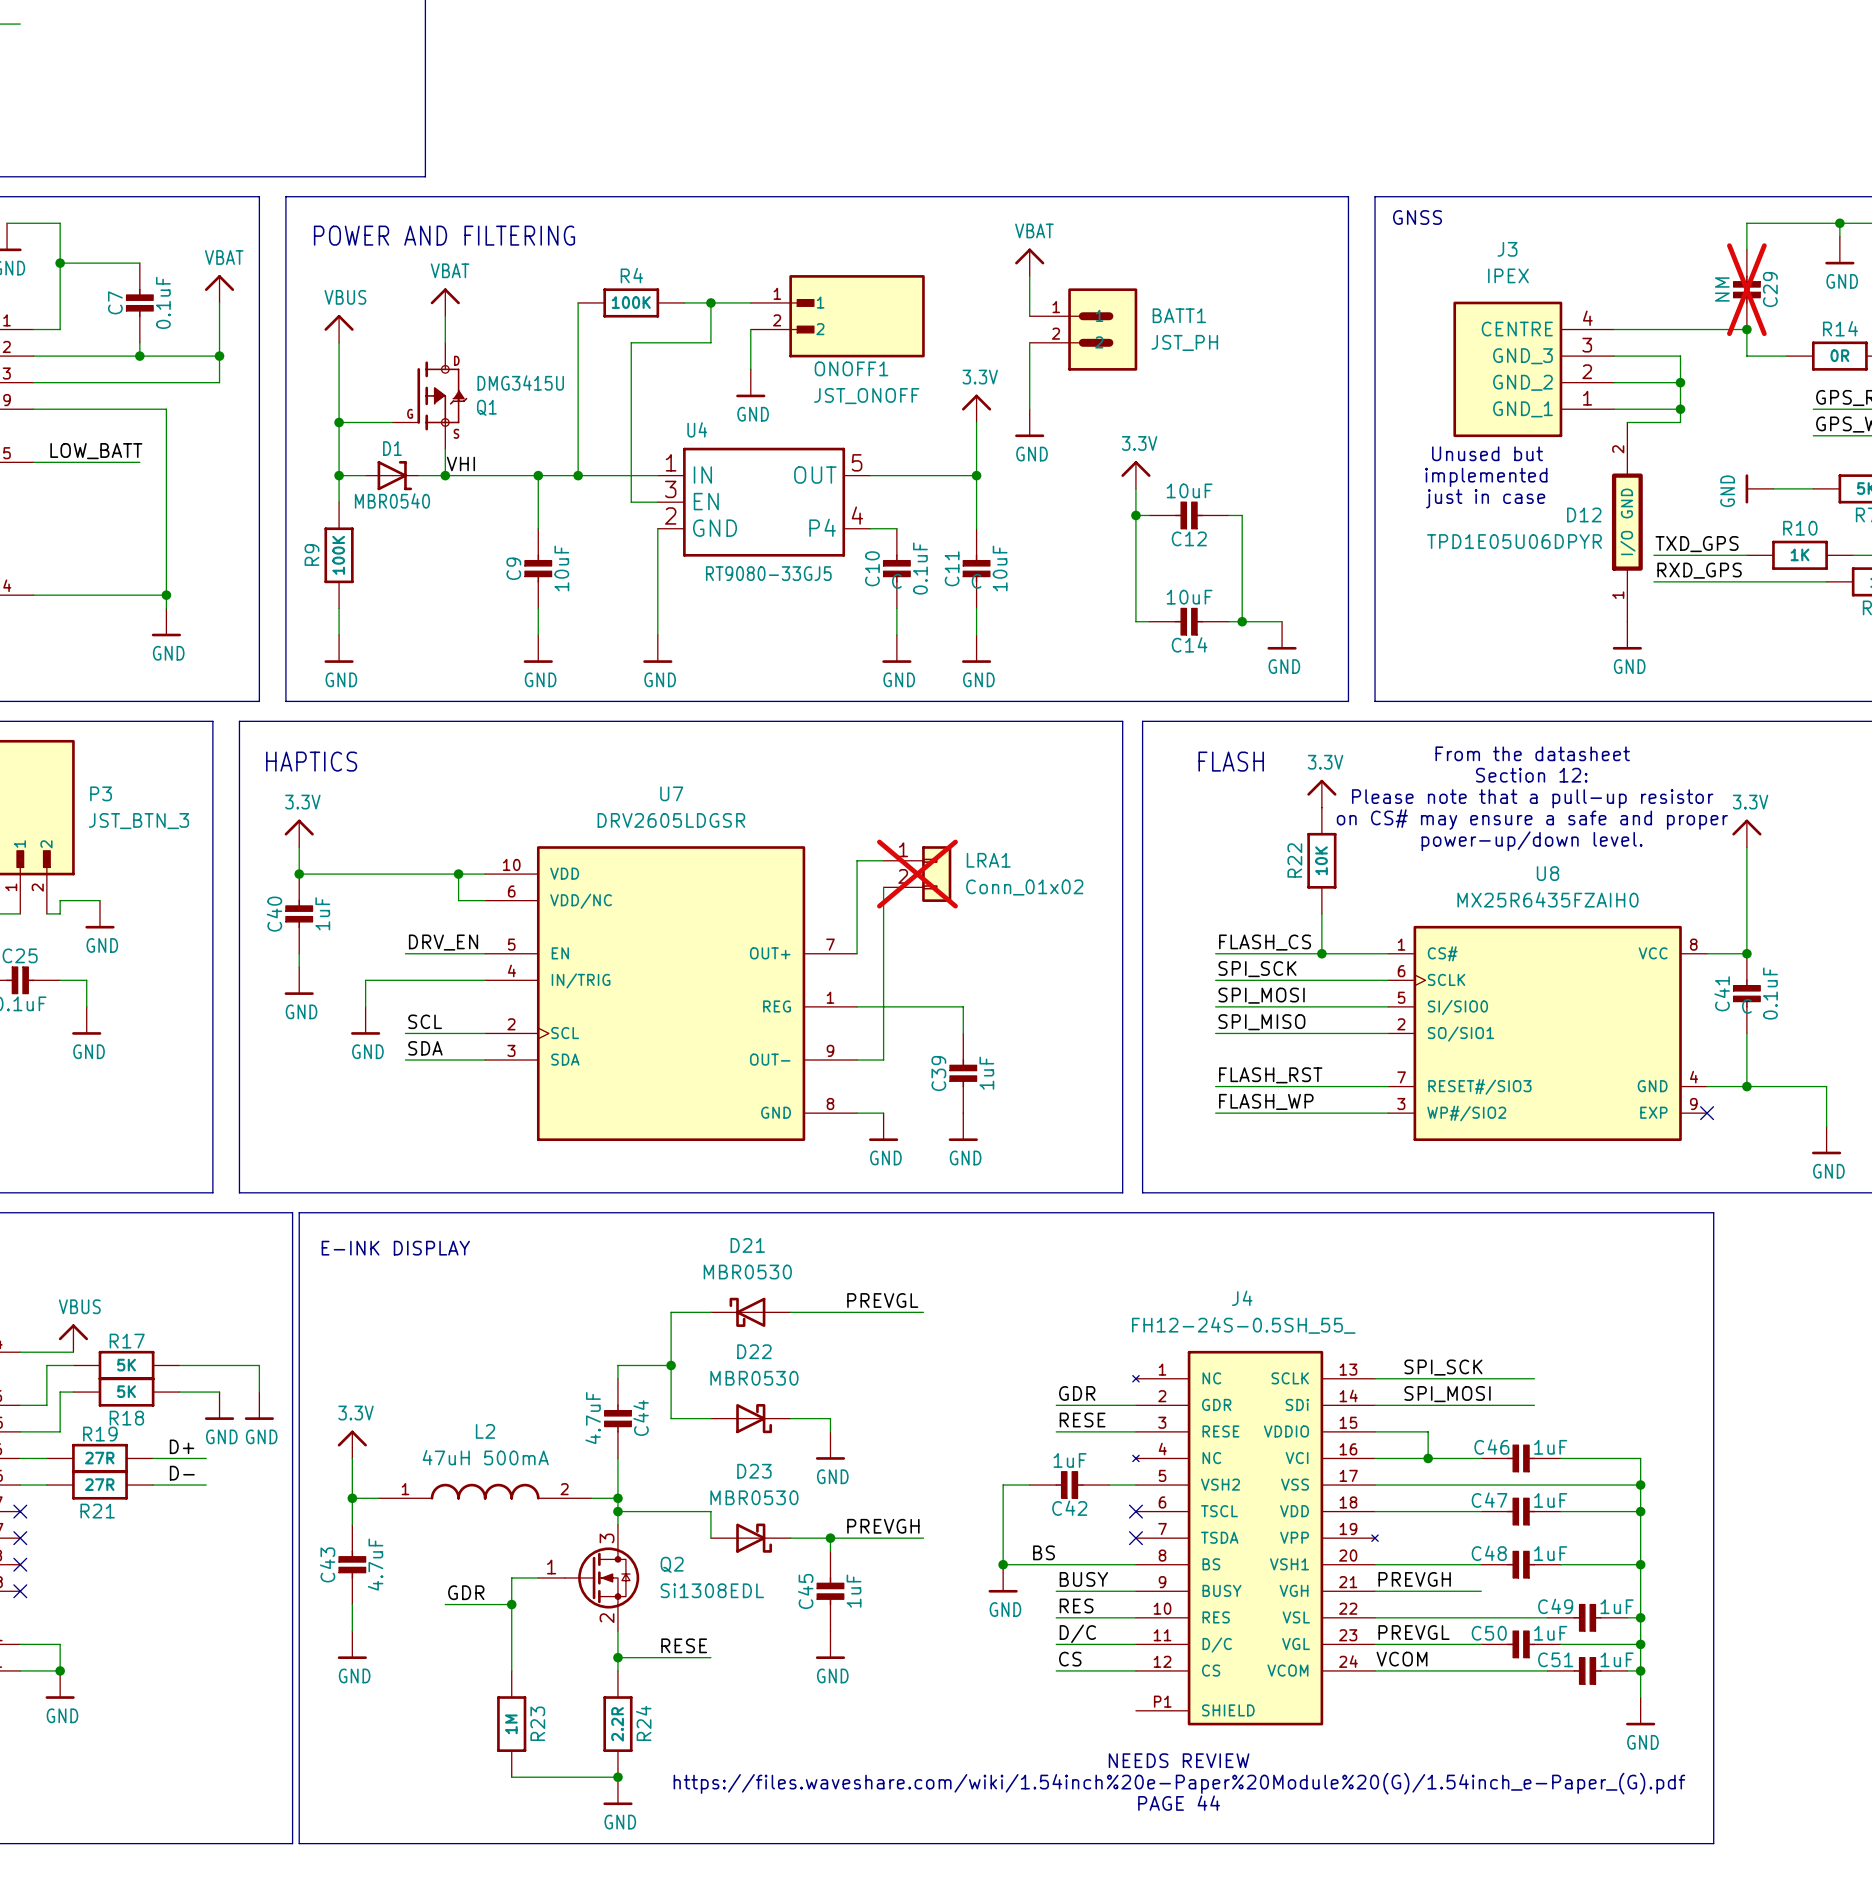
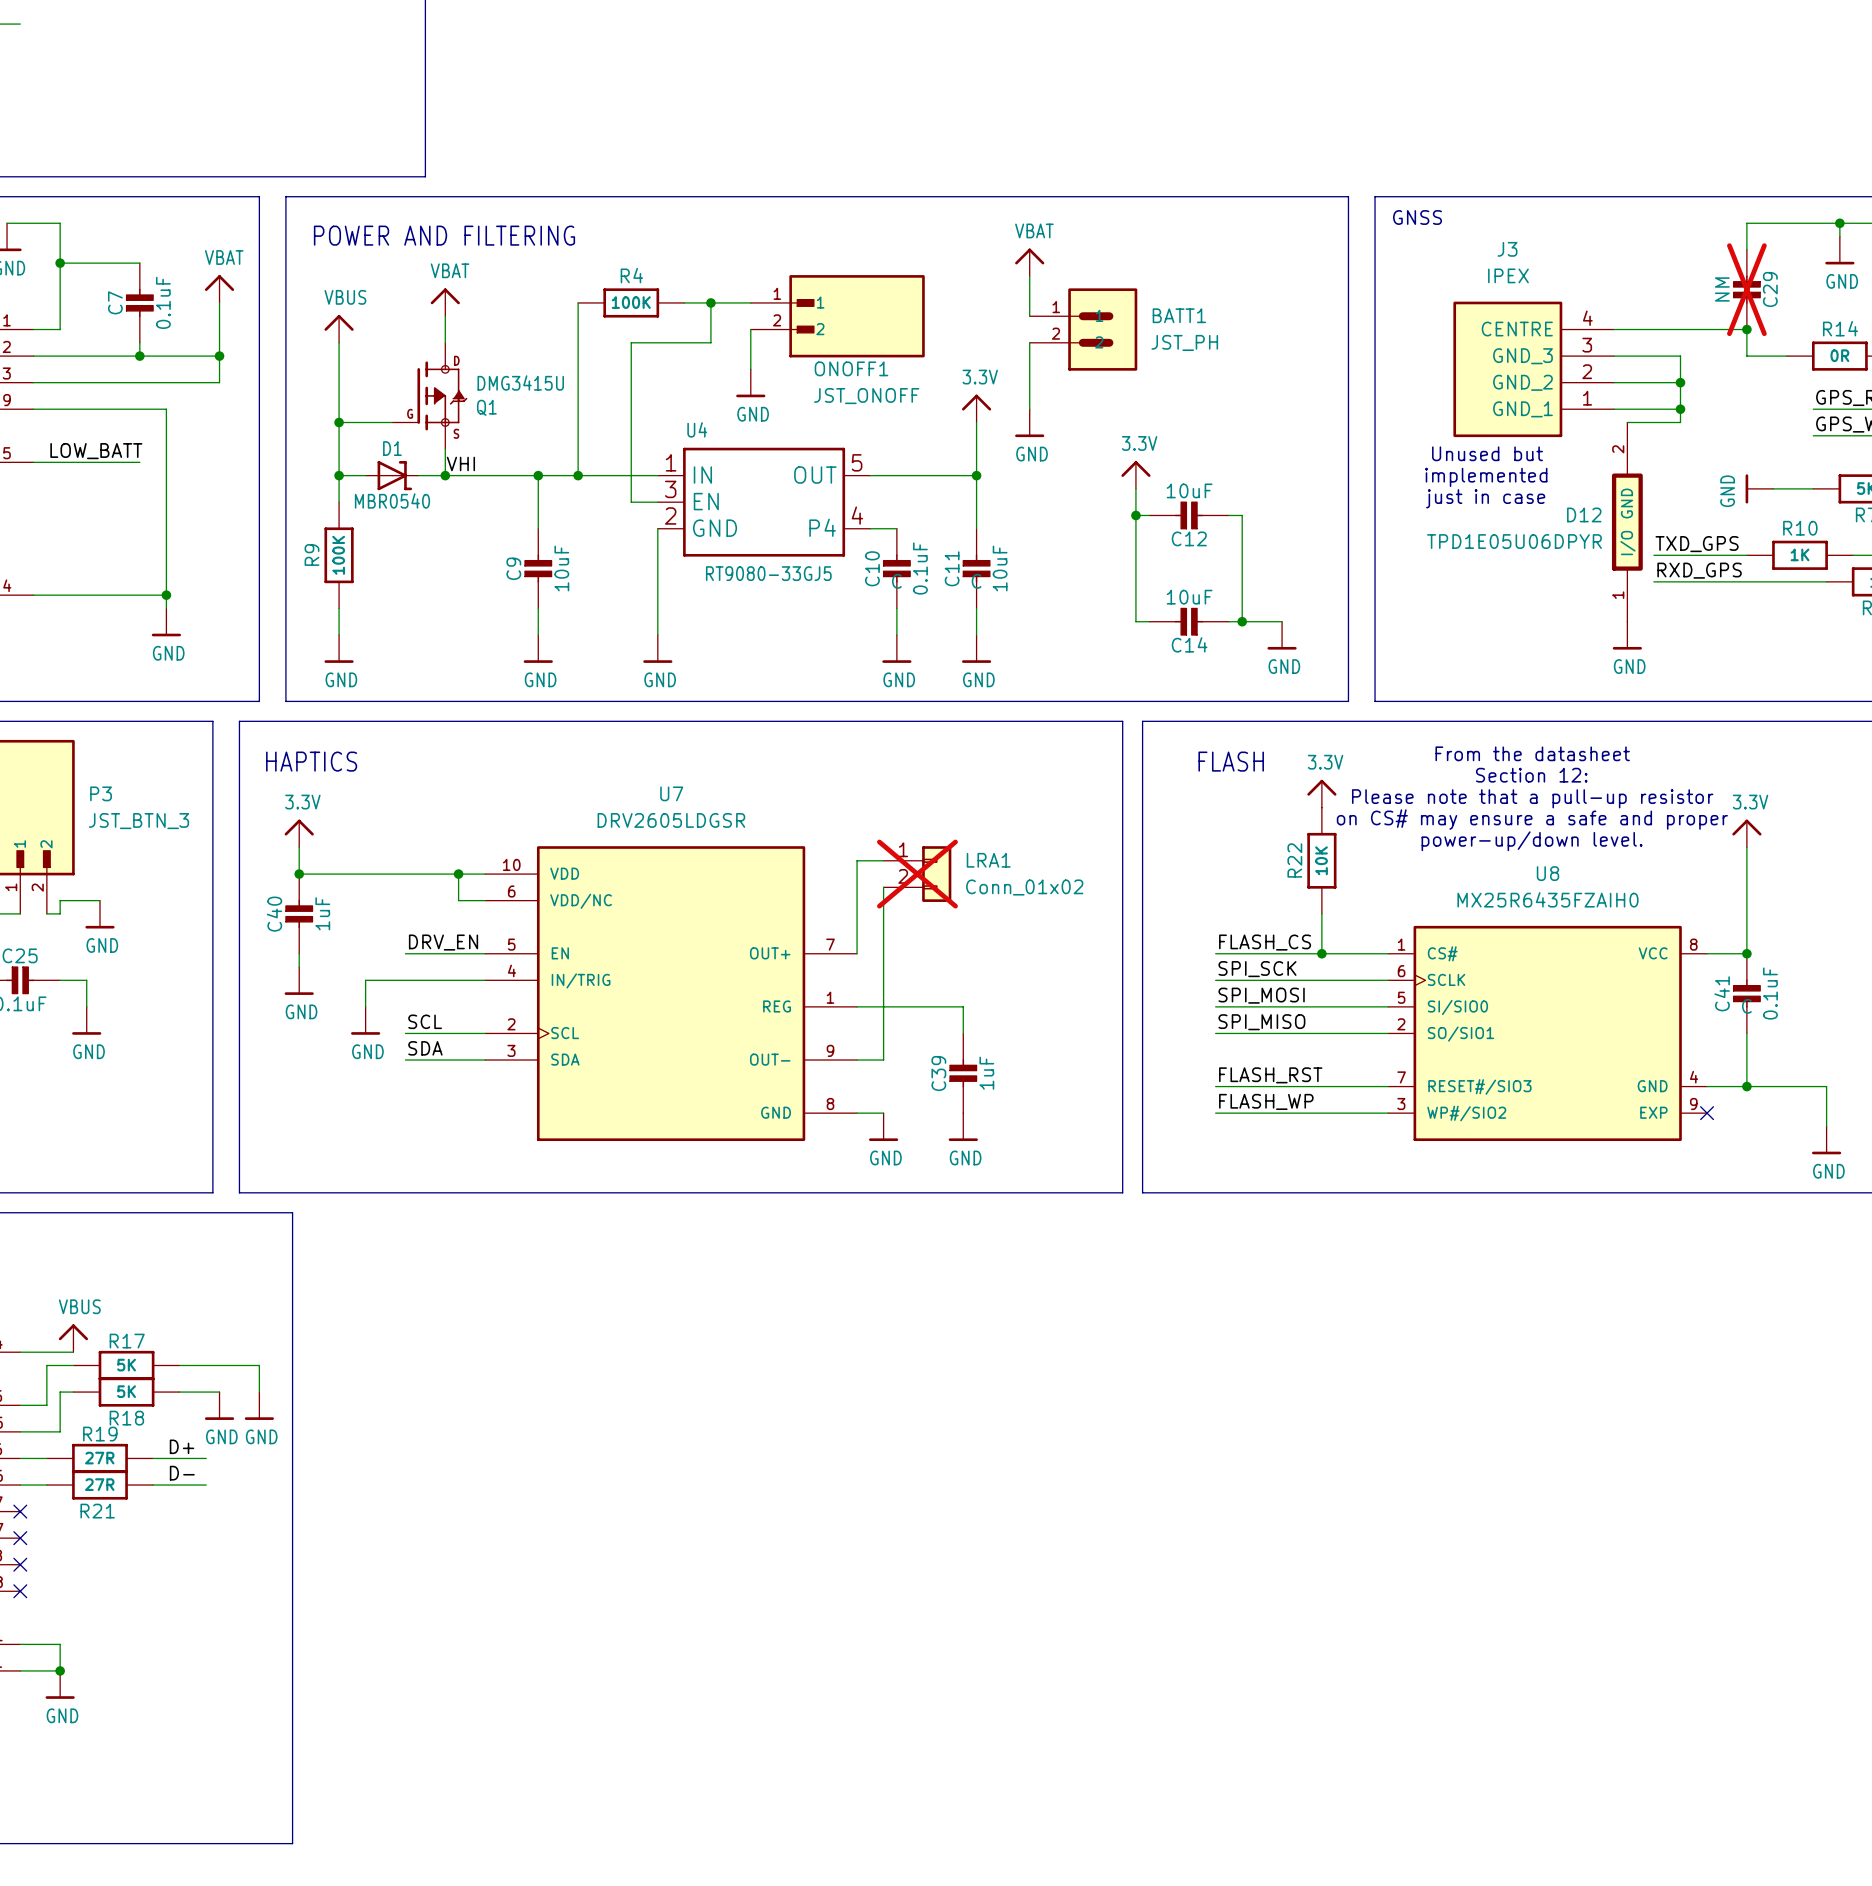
line: (299, 1212) (1713, 1212) (1713, 1843) (299, 1843) (299, 1212) -> none
text: E-INK DISPLAY (395, 1248) -> none
label: PREVGL (882, 1300) -> none
wire: (710, 1312) (671, 1312) (671, 1418) (710, 1418) -> none
D21: MBR0530 (750, 1312) -> none
wire: (790, 1312) (923, 1312) -> none
wire: (671, 1365) (617, 1365) (617, 1378) -> none
junction: (671, 1365) -> none
label: SPI_SCK (1443, 1367) -> none
wire: (1375, 1378) (1534, 1378) -> none
label: GDR (1077, 1393) -> none
label: SPI_MOSI (1447, 1394) -> none
wire: (1056, 1405) (1135, 1405) -> none
wire: (1375, 1405) (1534, 1405) -> none
C44: 4.7uF (617, 1418) -> none
D22: MBR0530 (750, 1418) -> none
wire: (790, 1418) (830, 1418) (830, 1431) -> none
label: RESE (1082, 1420) -> none
wire: (1056, 1431) (1135, 1431) -> none
wire: (1375, 1431) (1428, 1431) (1428, 1458) -> none
power symbol: 3.3V (352, 1444) -> none
power symbol: GND (830, 1445) -> none
wire: (352, 1458) (352, 1524) -> none
wire: (617, 1458) (617, 1524) -> none
wire: (1375, 1458) (1481, 1458) -> none
junction: (1428, 1458) -> none
C46: 1uF (1521, 1458) -> none
wire: (1560, 1458) (1640, 1458) (1640, 1697) -> none
wire: (1029, 1485) (1003, 1485) (1003, 1564) (1135, 1564) -> none
C42: 1uF (1069, 1485) -> none
wire: (1109, 1485) (1135, 1485) -> none
wire: (1375, 1485) (1640, 1485) -> none
junction: (1640, 1485) -> none
L2: 47uH 500mA (485, 1491) -> none
wire: (352, 1498) (378, 1498) -> none
junction: (352, 1498) -> none
wire: (591, 1498) (617, 1498) -> none
junction: (617, 1498) -> none
wire: (617, 1511) (710, 1511) (710, 1538) -> none
junction: (617, 1511) -> none
no-connect mark: (1135, 1511) -> none
wire: (1375, 1511) (1481, 1511) -> none
C47: 1uF (1521, 1511) -> none
wire: (1560, 1511) (1640, 1511) -> none
junction: (1640, 1511) -> none
label: PREVGH (883, 1526) -> none
D23: MBR0530 (750, 1538) -> none
wire: (790, 1538) (923, 1538) -> none
wire: (830, 1538) (830, 1551) -> none
junction: (830, 1538) -> none
no-connect mark: (1135, 1538) -> none
J4: FH12-24S-0.5SH_55_ (1255, 1538) -> none
label: BS (1044, 1552) -> none
C43: 4.7uF (352, 1564) -> none
junction: (1003, 1564) -> none
wire: (1375, 1564) (1481, 1564) -> none
C48: 1uF (1521, 1564) -> none
wire: (1560, 1564) (1640, 1564) -> none
junction: (1640, 1564) -> none
wire: (538, 1577) (511, 1577) (511, 1670) -> none
Q2: Si1308EDL (588, 1577) -> none
power symbol: GND (1003, 1578) -> none
label: BUSY (1083, 1579) -> none
label: PREVGH (1414, 1579) -> none
C45: 1uF (830, 1591) -> none
wire: (1056, 1591) (1135, 1591) -> none
wire: (1375, 1591) (1481, 1591) -> none
label: GDR (466, 1592) -> none
wire: (352, 1604) (352, 1631) -> none
wire: (445, 1604) (511, 1604) -> none
junction: (511, 1604) -> none
label: RES (1076, 1605) -> none
wire: (1056, 1617) (1135, 1617) -> none
wire: (1375, 1617) (1547, 1617) -> none
C49: 1uF (1587, 1617) -> none
wire: (1627, 1617) (1640, 1617) -> none
junction: (1640, 1617) -> none
wire: (617, 1631) (617, 1670) -> none
label: PREVGL (1414, 1632) -> none
label: D/C (1077, 1633) -> none
wire: (1056, 1644) (1135, 1644) -> none
wire: (1375, 1644) (1481, 1644) -> none
C50: 1uF (1521, 1644) -> none
wire: (1560, 1644) (1640, 1644) -> none
junction: (1640, 1644) -> none
power symbol: GND (352, 1645) -> none
label: RESE (684, 1645) -> none
power symbol: GND (830, 1645) -> none
wire: (617, 1657) (710, 1657) -> none
junction: (617, 1657) -> none
label: CS (1070, 1659) -> none
label: VCOM (1402, 1659) -> none
wire: (1056, 1670) (1135, 1670) -> none
wire: (1375, 1670) (1547, 1670) -> none
C51: 1uF (1587, 1670) -> none
wire: (1627, 1670) (1640, 1670) -> none
junction: (1640, 1670) -> none
power symbol: GND (1640, 1711) -> none
R23: 1M (511, 1724) -> none
R24: 2.2R (617, 1724) -> none
text: NEEDS REVIEW (1179, 1760) -> none
wire: (511, 1777) (617, 1777) -> none
junction: (617, 1777) -> none
text: https://files.waveshare.com/wiki/1.54inch%20e-Paper%20Module%20(G)/1.54inch_e-Paper_(G).pdf (1179, 1783) -> none
power symbol: GND (617, 1791) -> none
text: PAGE 44 (1179, 1803) -> none

